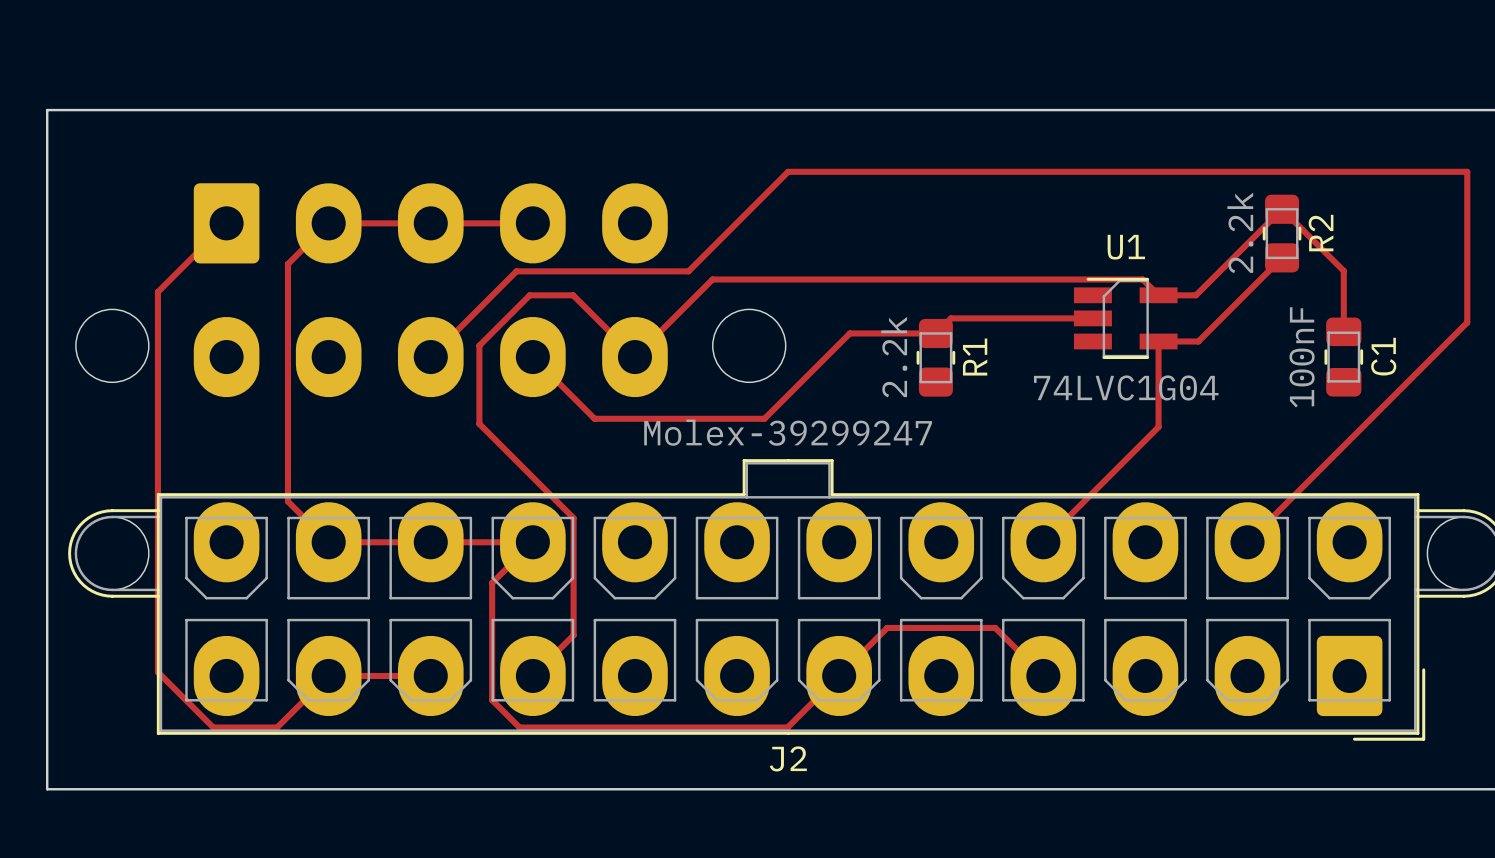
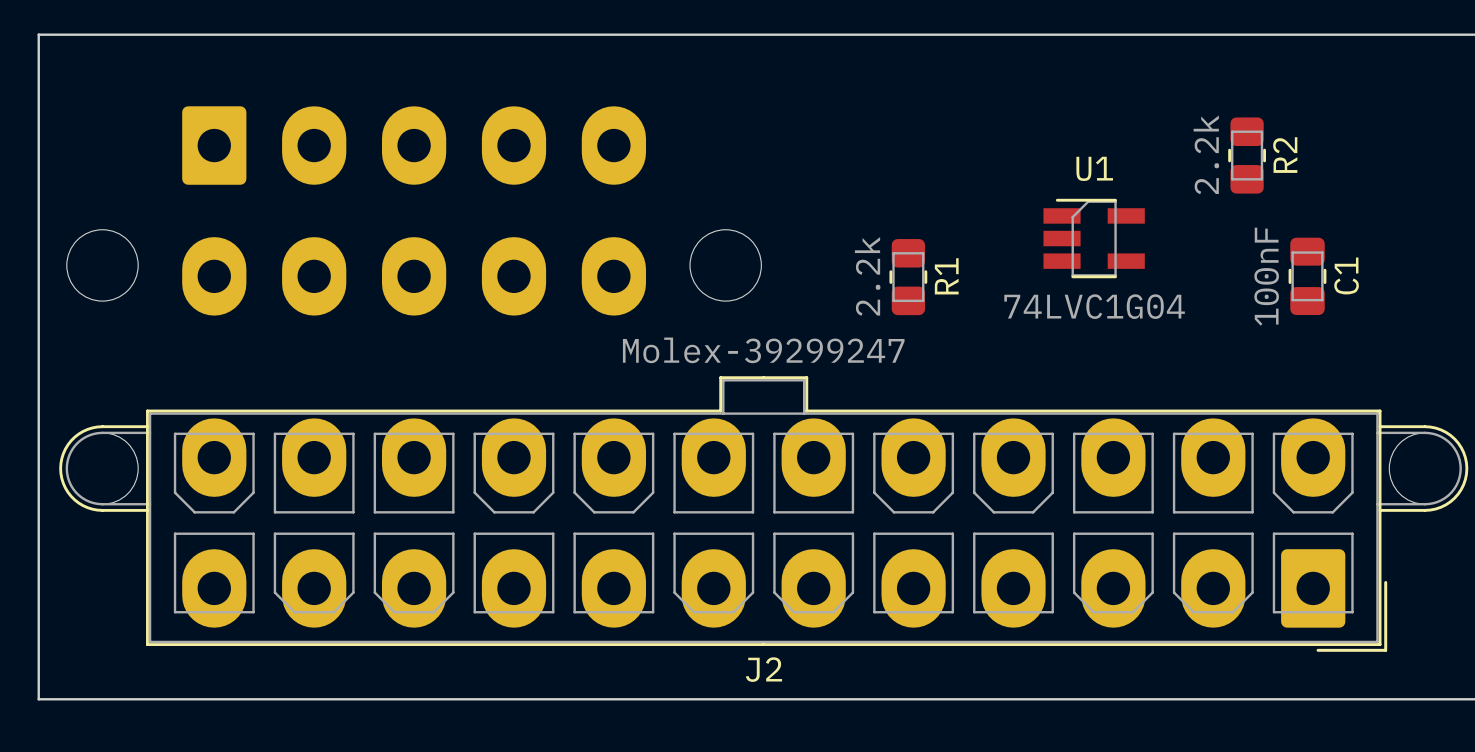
track: (226, 223) (157, 292) (157, 672) (213, 727) (277, 727) (328, 675) (430, 675) -> none
track: (532, 223) (328, 223) (287, 264) (287, 501) (328, 542) (532, 542) (492, 582) (492, 700) (519, 727) (787, 727) (887, 627) (995, 627) (1043, 675) -> none
track: (1282, 257) (1198, 341) (1158, 341) (1158, 427) (1043, 542) -> none
track: (1092, 318) (950, 318) (935, 333) (849, 333) (764, 418) (594, 418) (532, 357) -> none
track: (1343, 331) (1343, 271) (1282, 209) (1196, 295) (1158, 295) (1142, 279) (712, 279) (634, 357) (573, 295) (529, 295) (479, 345) (479, 423) (573, 518) (573, 635) (532, 675) -> none
track: (430, 357) (516, 271) (688, 271) (788, 171) (1467, 171) (1467, 322) (1247, 542) -> none

